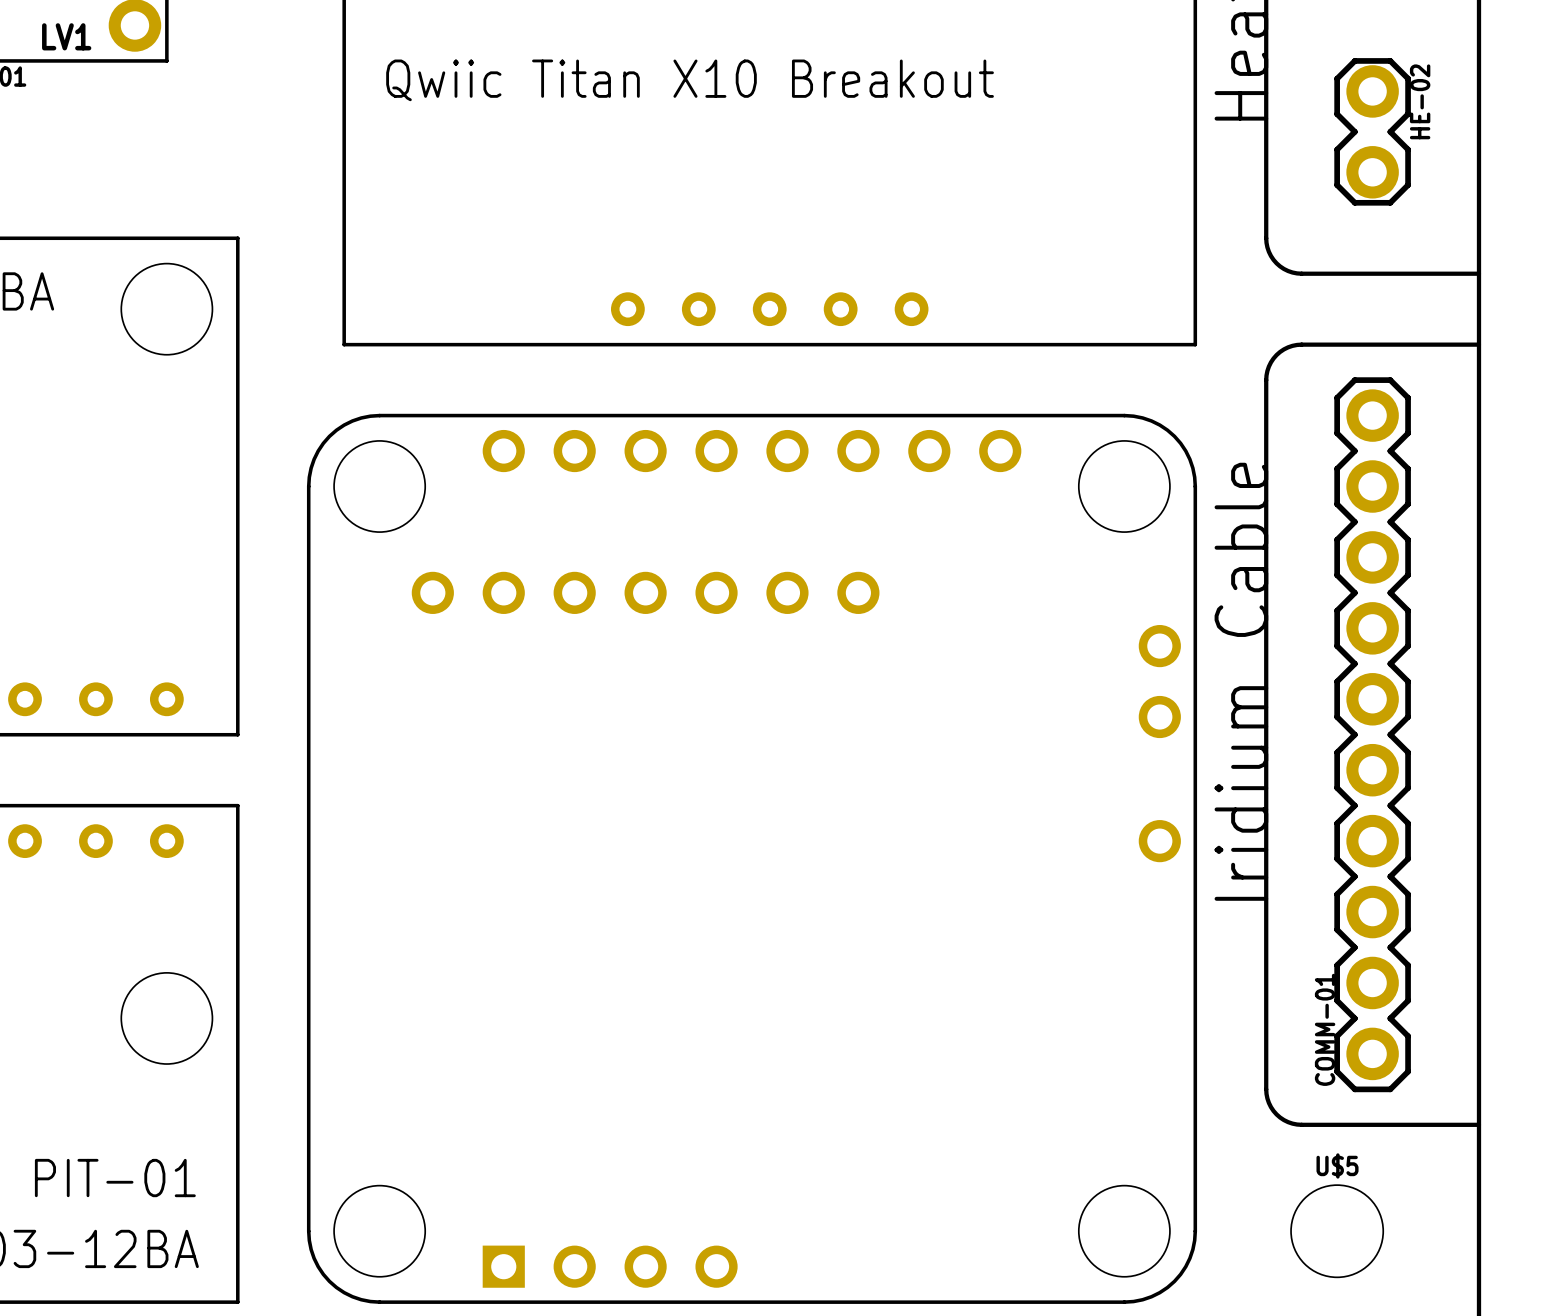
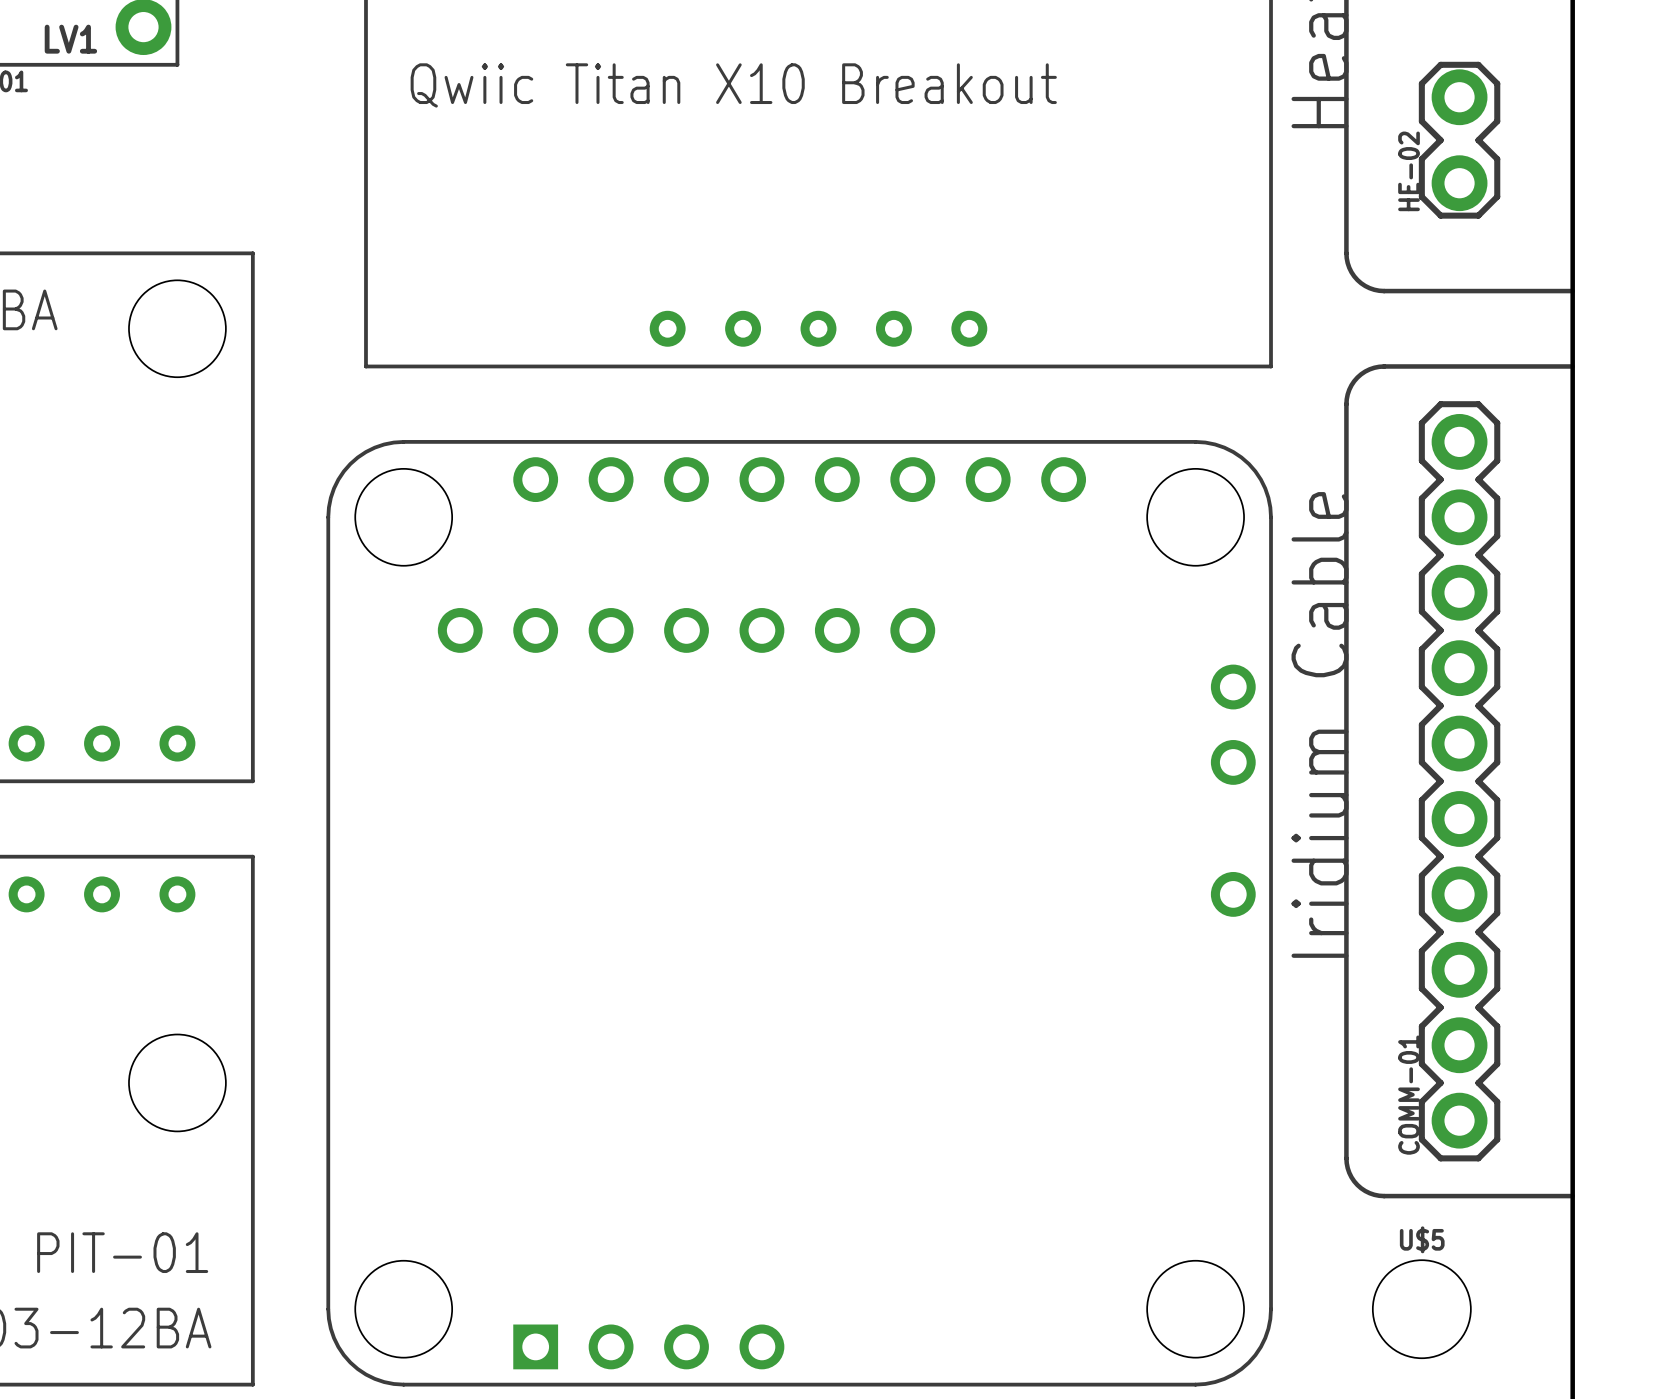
HE-02 name position: HE-02 (1420, 101) -> HE-02 (1409, 171)

